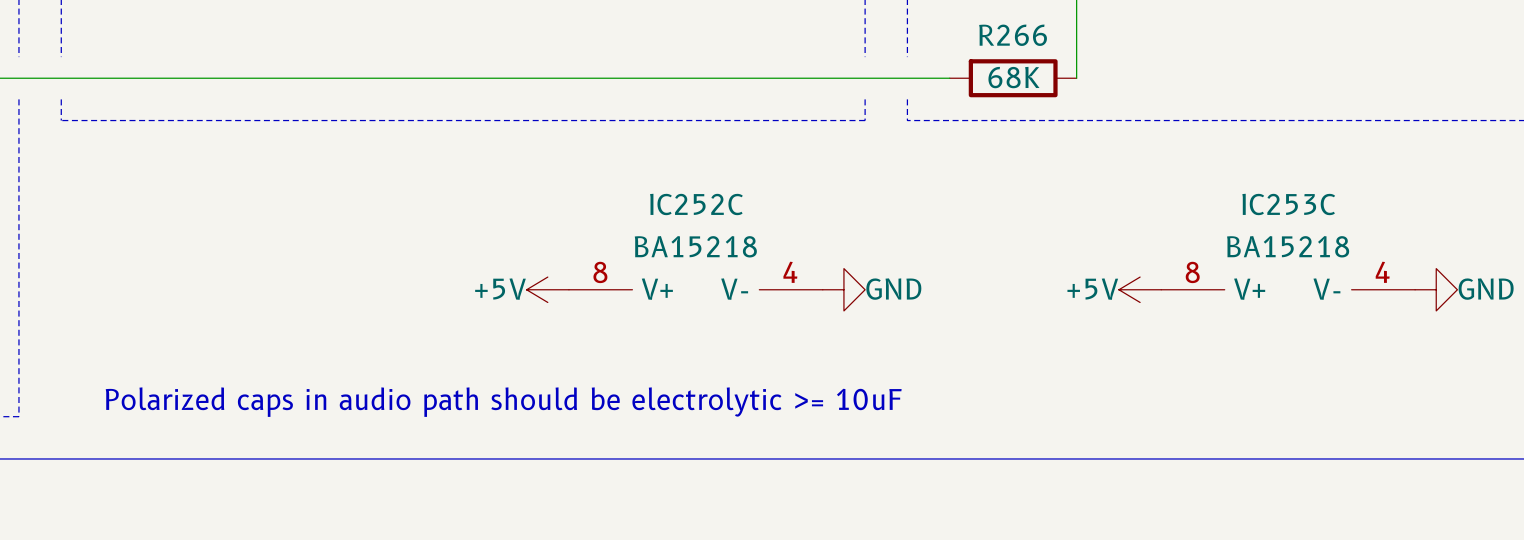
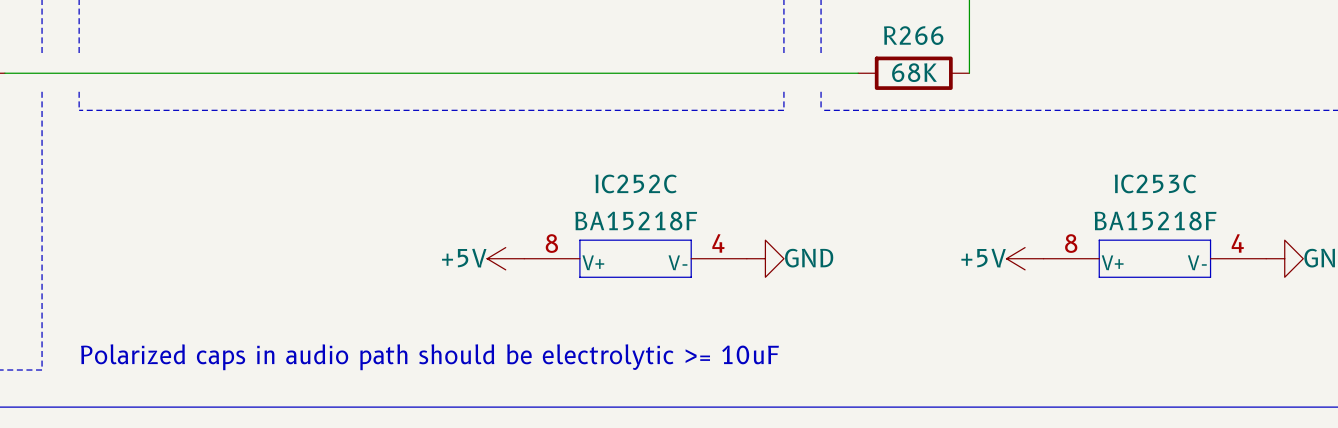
IC252C value: BA15218 (695, 246) -> BA15218F (636, 221)
IC253C value: BA15218 (1288, 246) -> BA15218F (1155, 221)
line: none -> (579, 240) (691, 240) (691, 277) (579, 277) (579, 240)
line: none -> (1099, 240) (1210, 240) (1210, 277) (1099, 277) (1099, 240)
IC252C symbol: [568, 289, 823, 290] -> [524, 258, 747, 259]
IC253C symbol: [1161, 289, 1416, 290] -> [1043, 258, 1267, 259]
text position: Polarized caps in audio path should be electrolytic >= 10uF (503, 402) -> Polarized caps in audio path should be electrolytic >= 10uF (429, 357)

